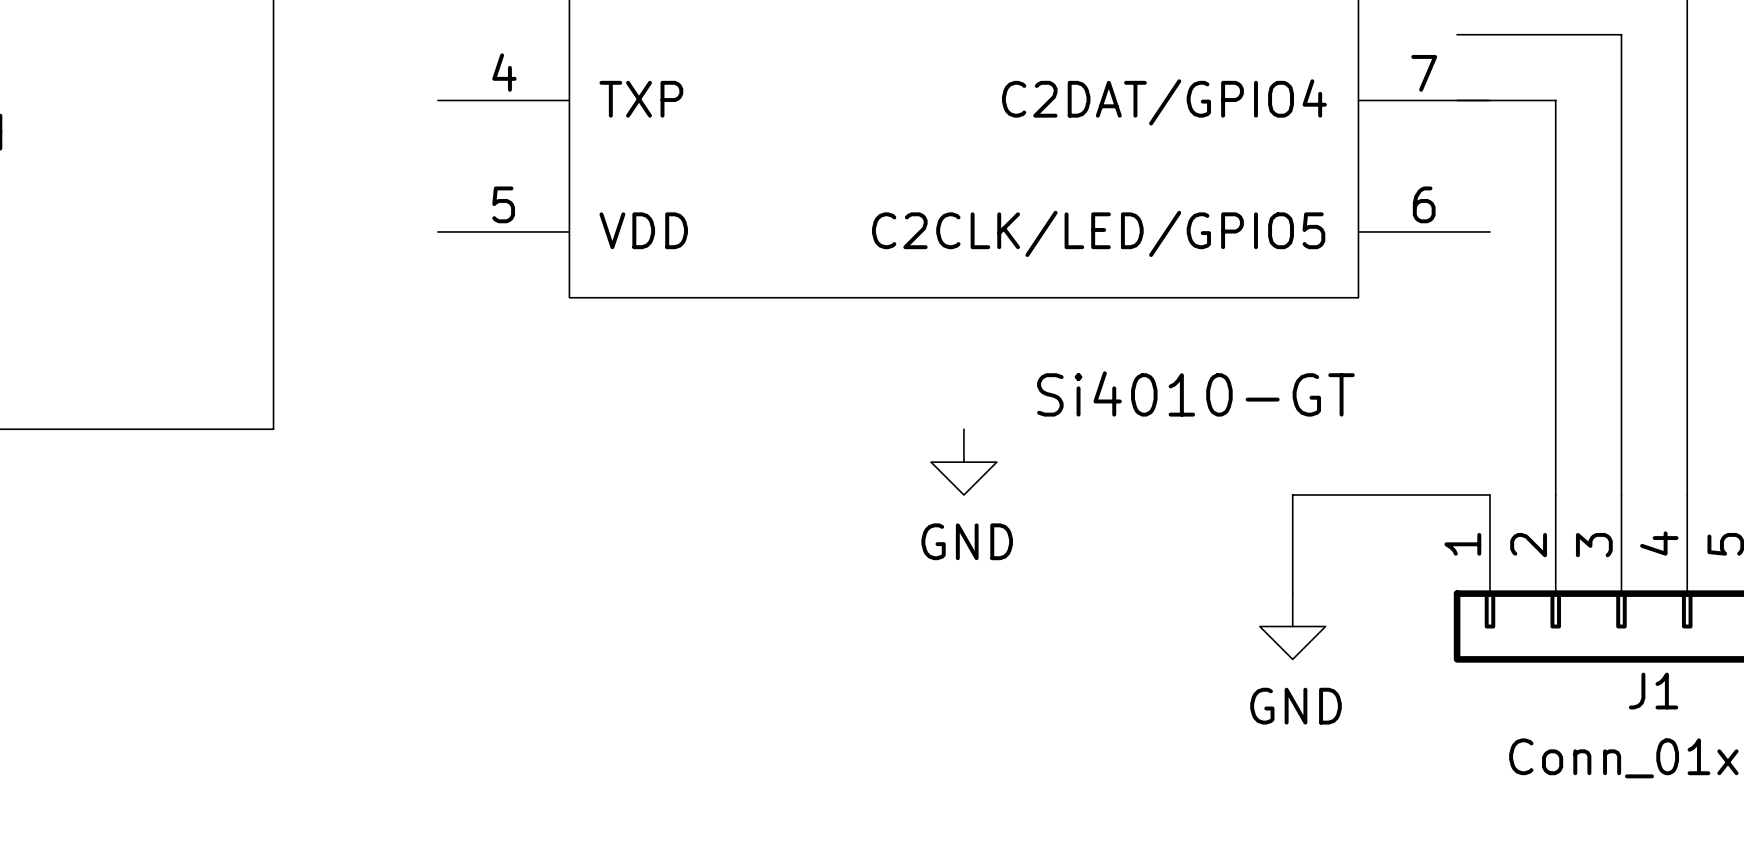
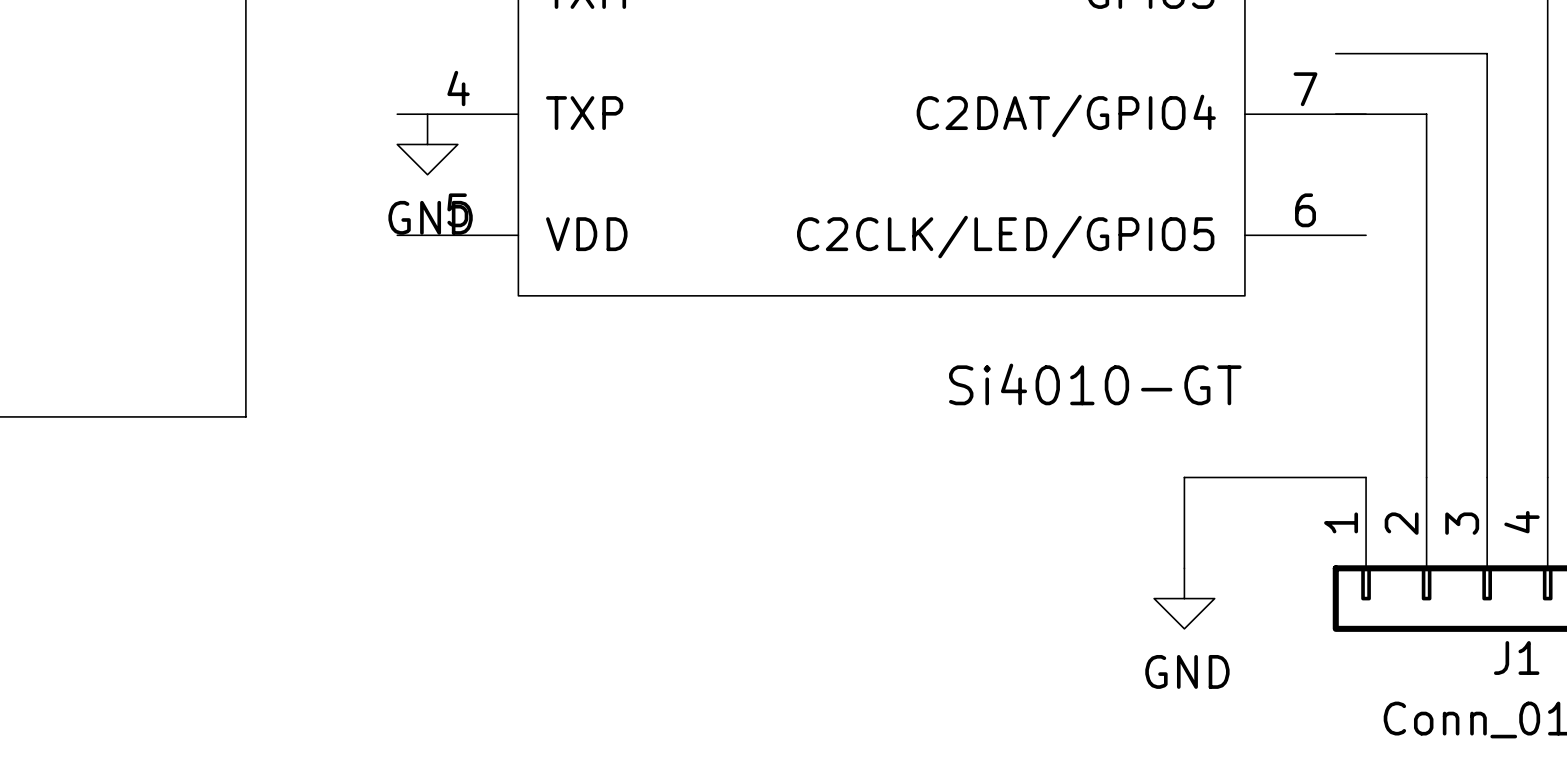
power symbol position: GND (963, 462) -> GND (427, 144)

